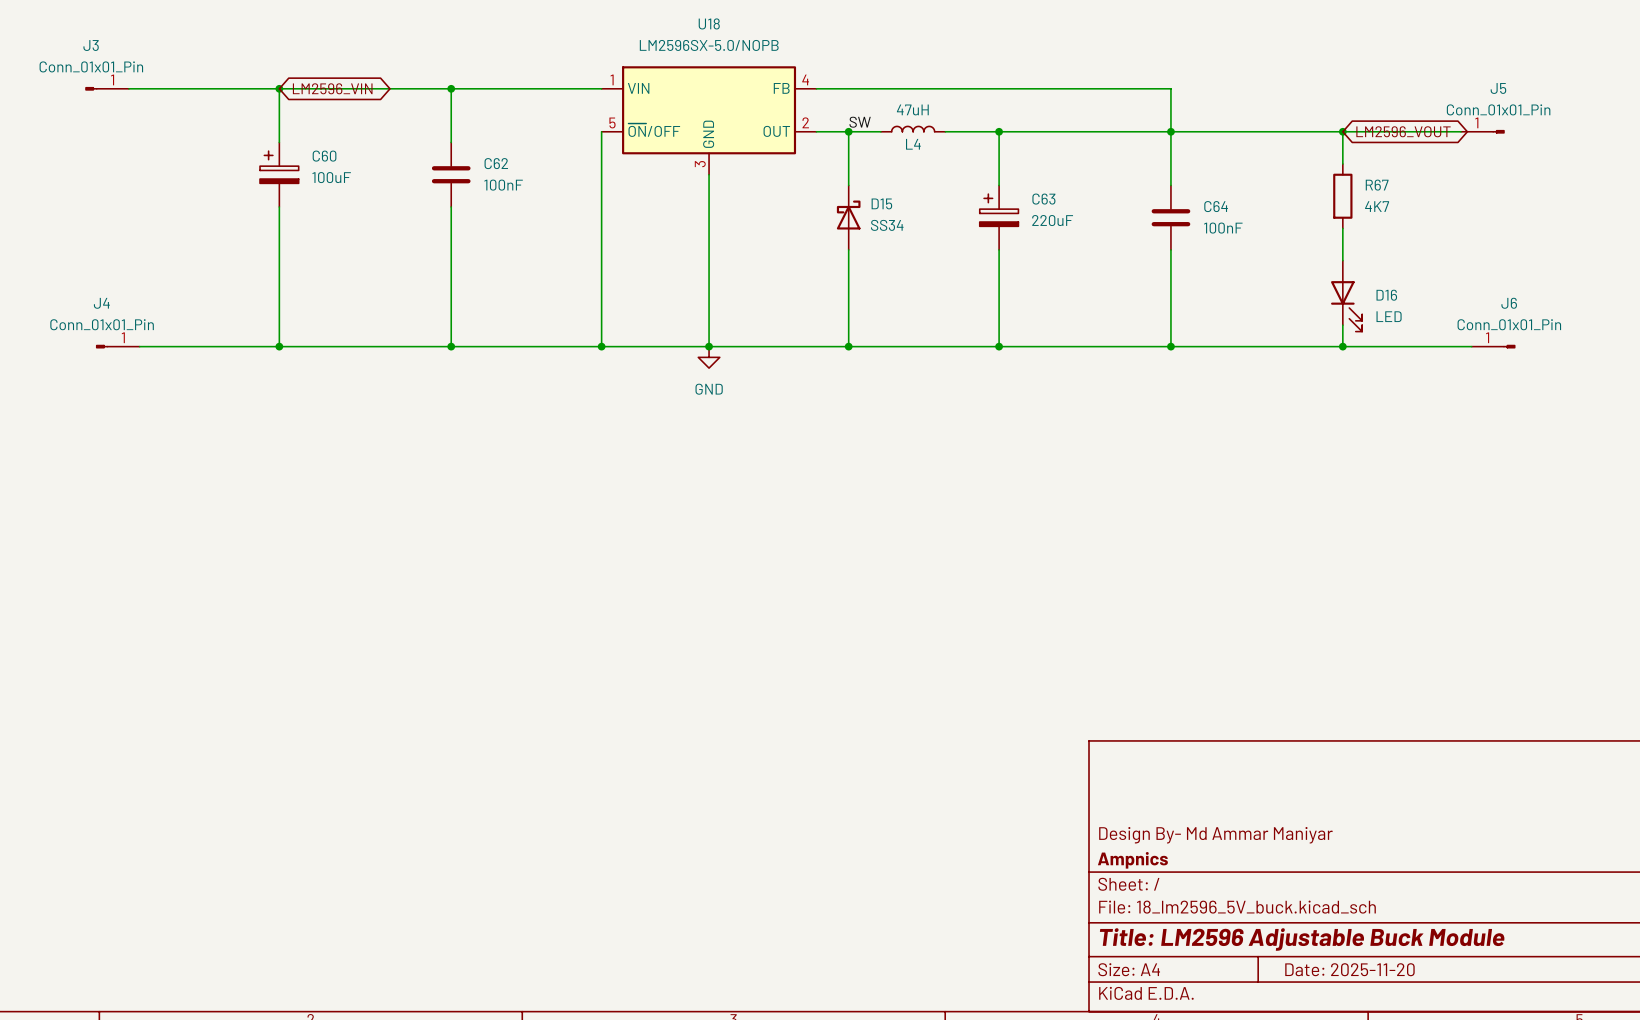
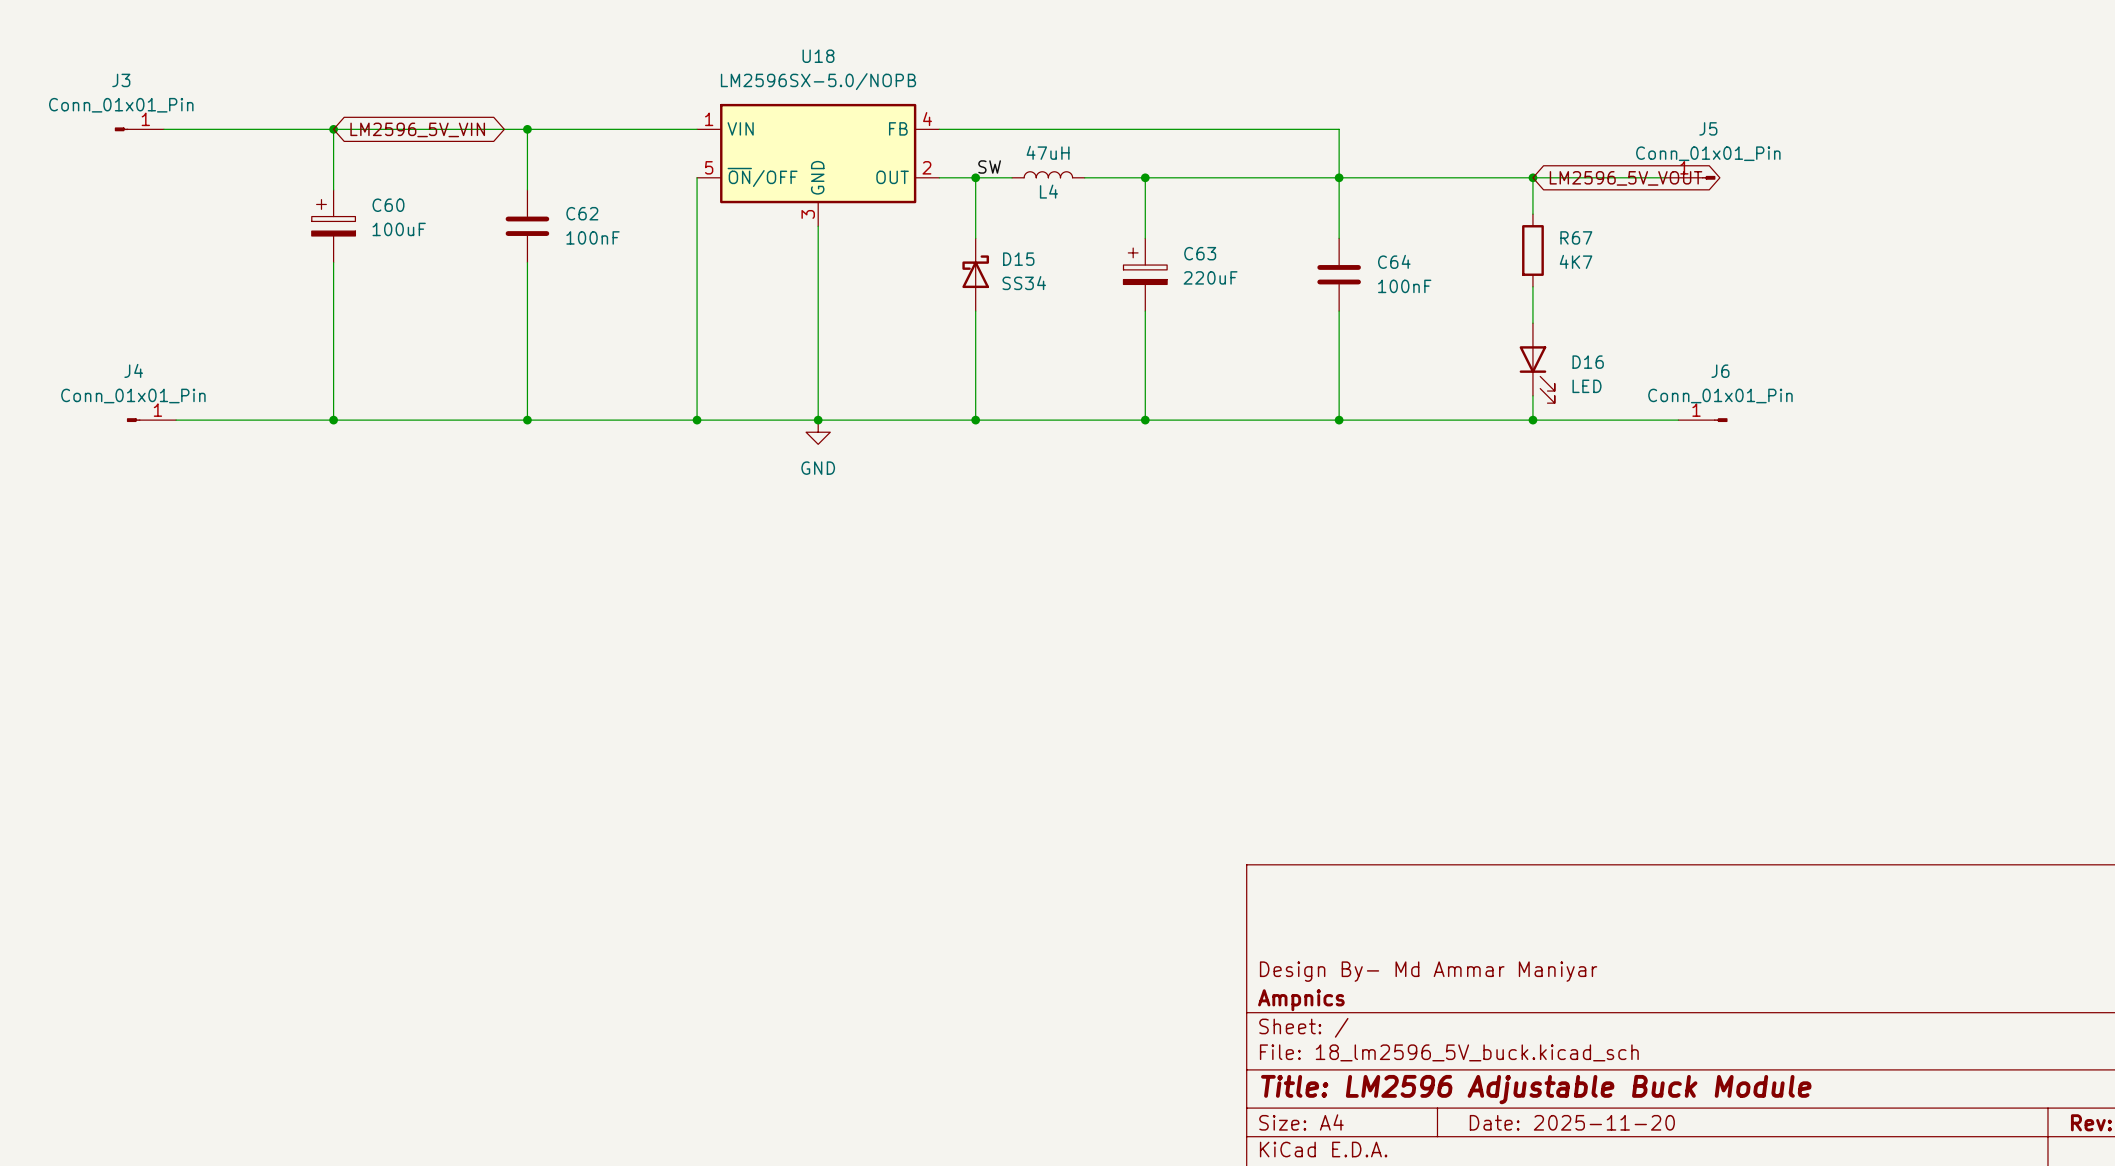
global label: LM2596_VIN (332, 88) -> LM2596_5V_VIN (417, 129)
global label: LM2596_VOUT (1403, 131) -> LM2596_5V_VOUT (1626, 178)

